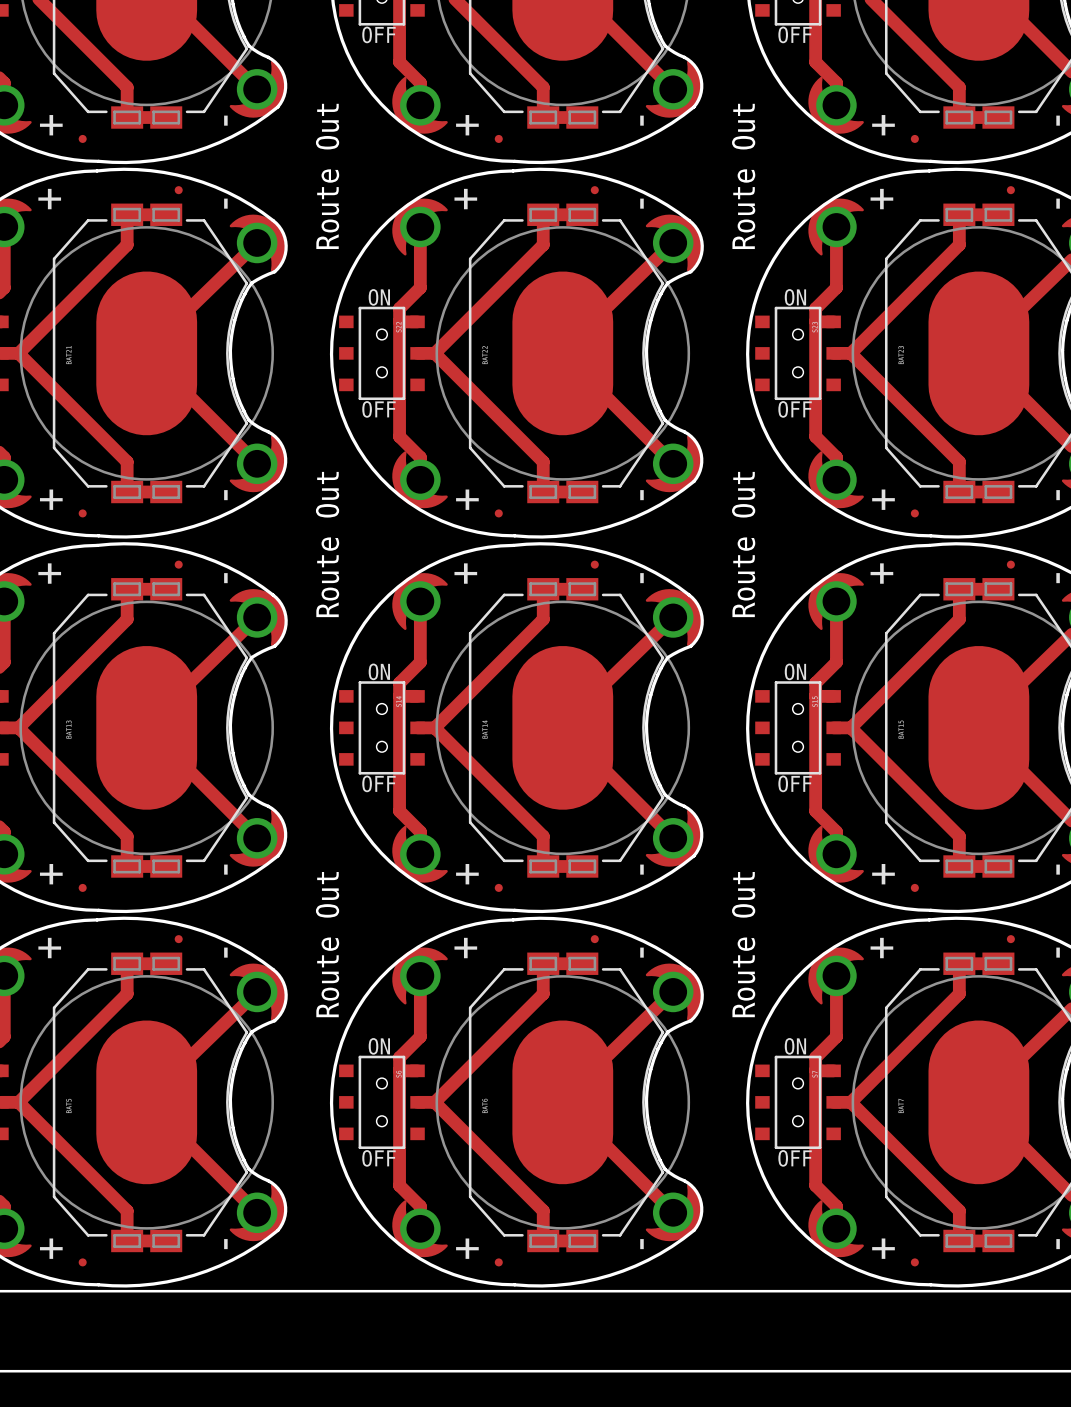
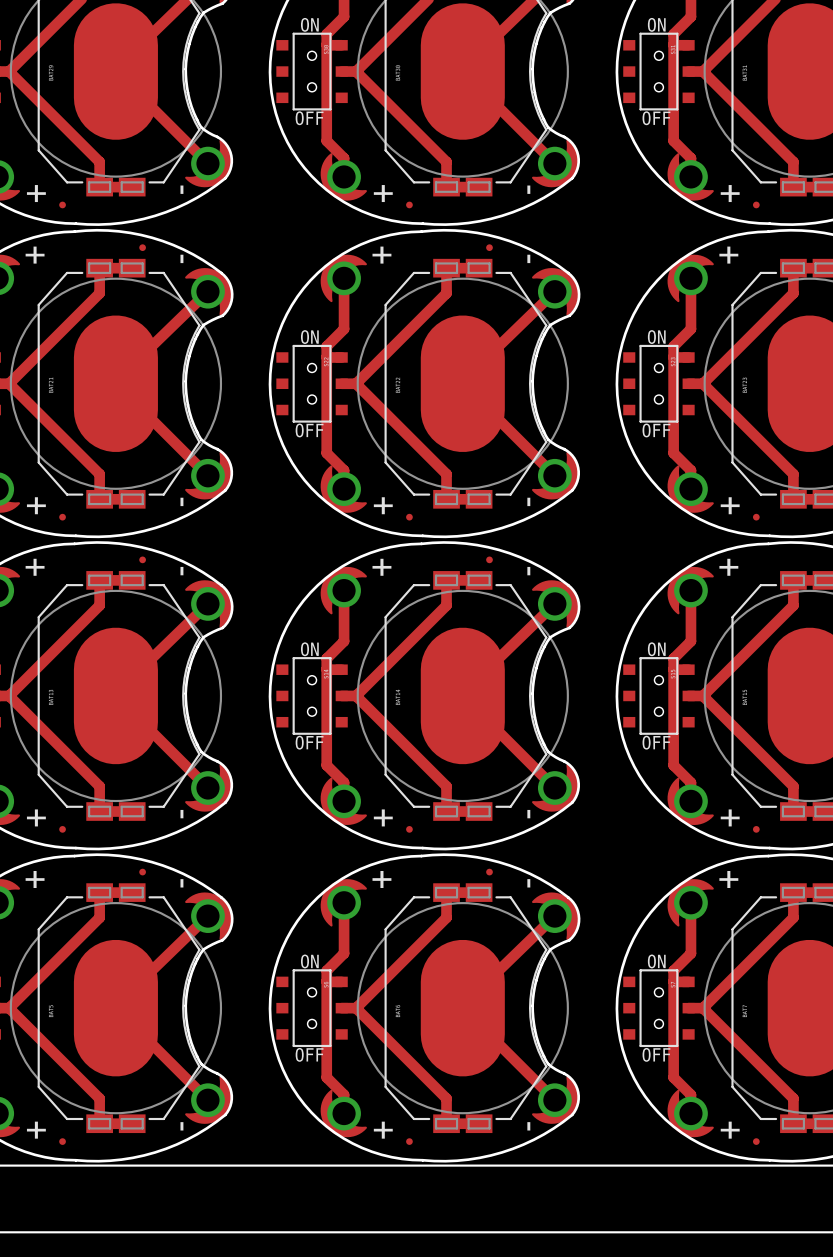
text: Route Out (327, 176) -> none
text: Route Out (743, 176) -> none
text: Route Out (327, 544) -> none
text: Route Out (743, 544) -> none
text: Route Out (327, 944) -> none
text: Route Out (743, 944) -> none

